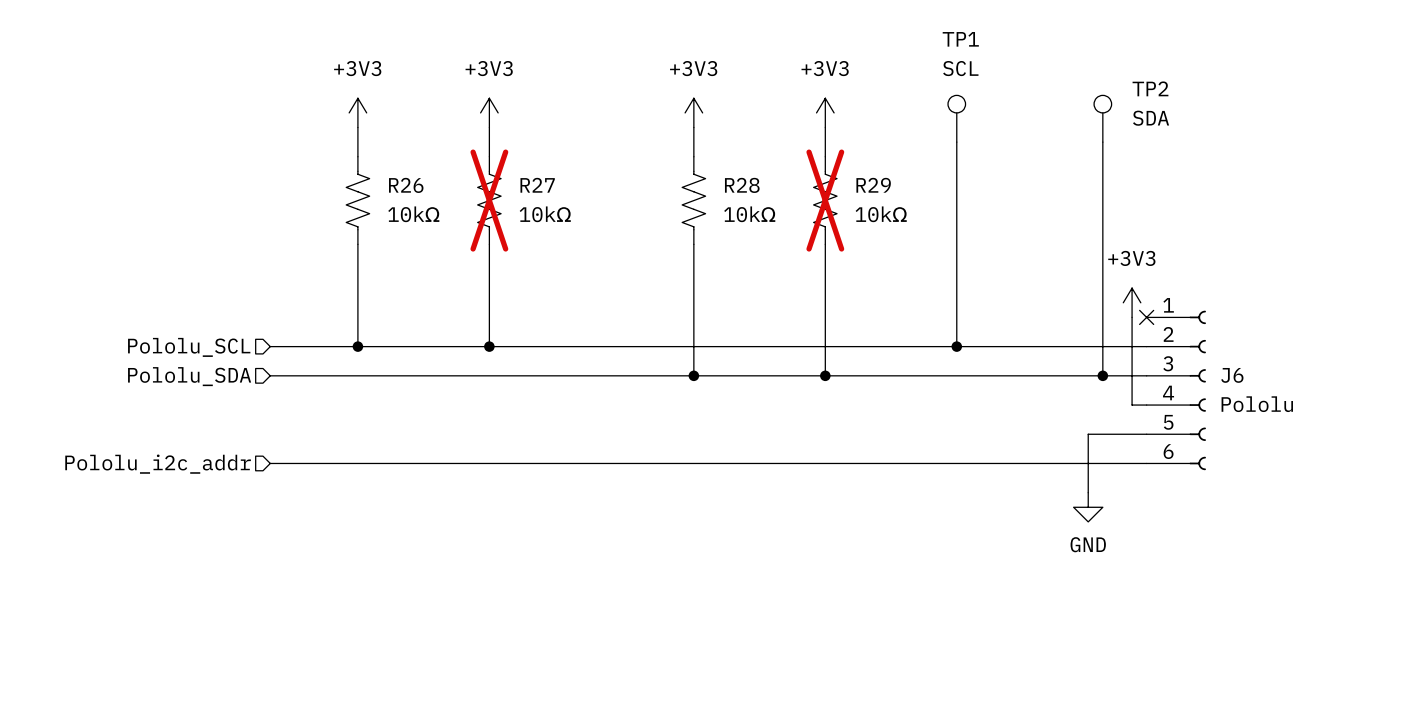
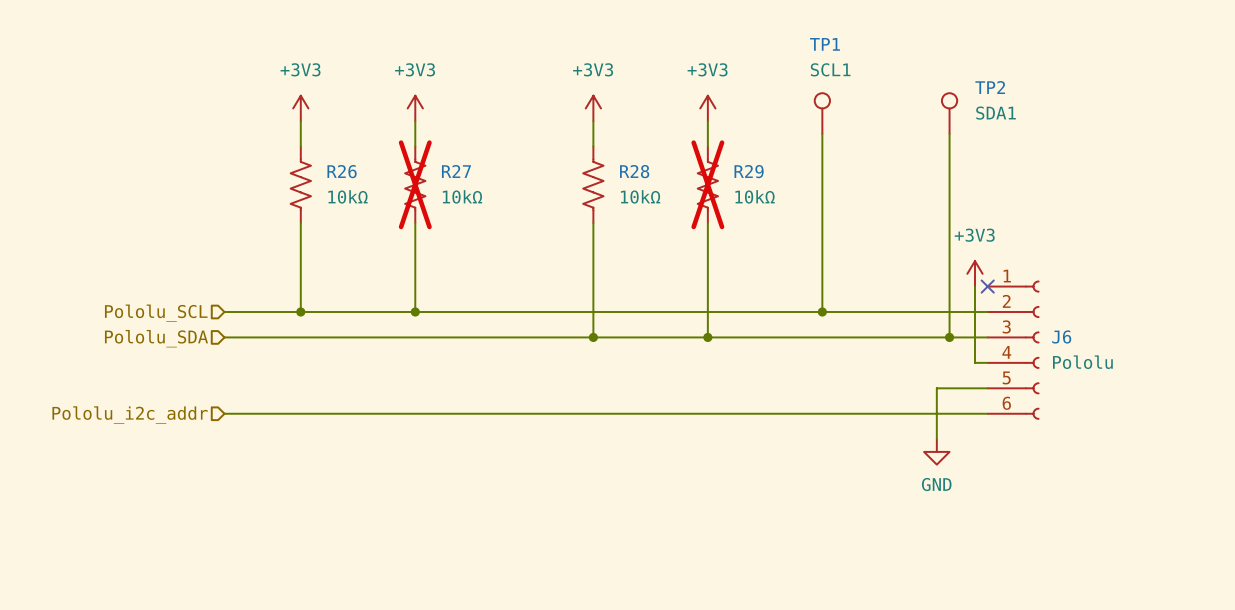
TP1 value: SCL (960, 68) -> SCL1 (830, 69)
TP2 value: SDA (1151, 118) -> SDA1 (996, 113)

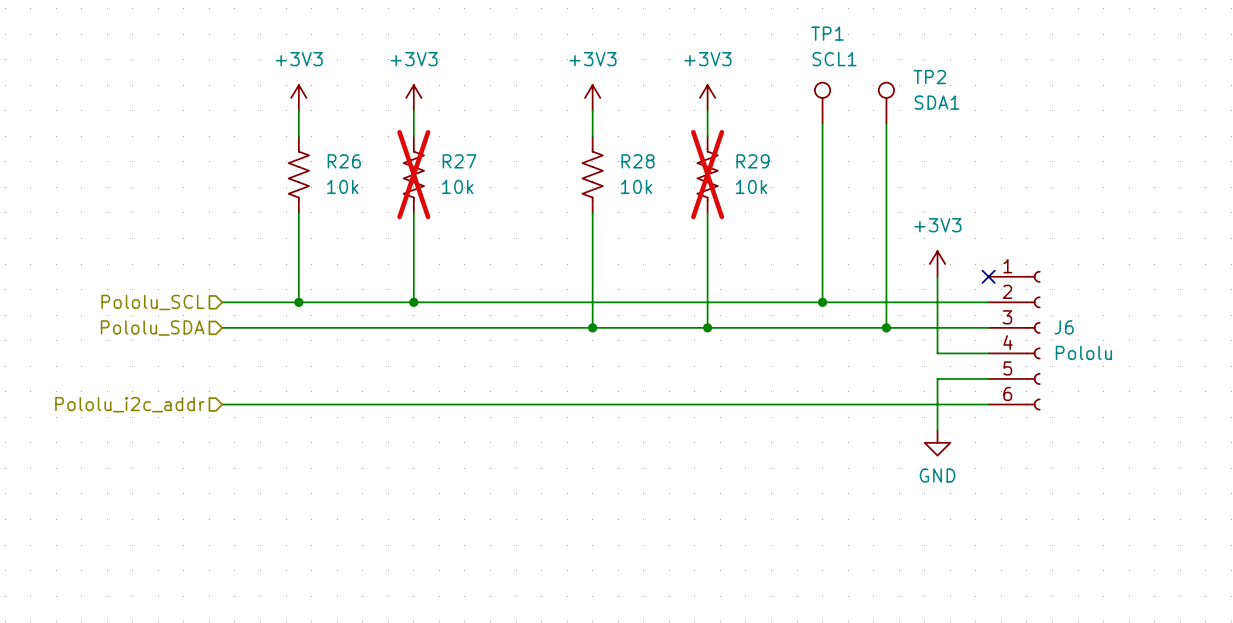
TP2 position: (949, 113) -> (886, 103)
wire: (949, 133) (949, 337) -> (886, 123) (886, 327)
R26 value: 10kΩ (347, 196) -> 10k (342, 186)
R27 value: 10kΩ (462, 196) -> 10k (457, 186)
R28 value: 10kΩ (640, 196) -> 10k (636, 186)
R29 value: 10kΩ (755, 196) -> 10k (751, 186)
power symbol position: +3V3 (975, 273) -> +3V3 (937, 264)
wire: (975, 286) (975, 362) -> (937, 276) (937, 353) (975, 353)
junction: none -> (886, 327)
junction: (949, 337) -> none

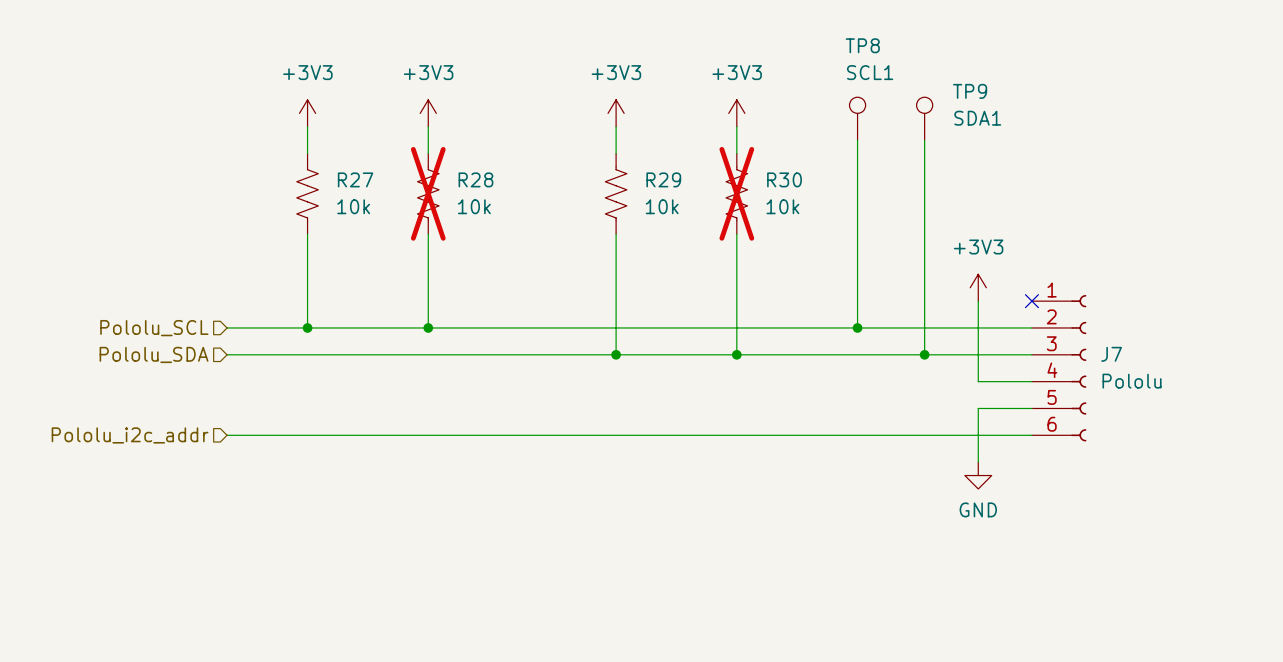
TP1 name: TP1 (827, 33) -> TP8 (862, 45)
TP2 name: TP2 (929, 77) -> TP9 (970, 91)
R26 name: R26 (344, 161) -> R27 (355, 179)
R27 name: R27 (459, 161) -> R28 (475, 179)
R28 name: R28 (638, 161) -> R29 (663, 179)
R29 name: R29 (753, 161) -> R30 (784, 179)
J6 name: J6 (1064, 327) -> J7 (1111, 354)

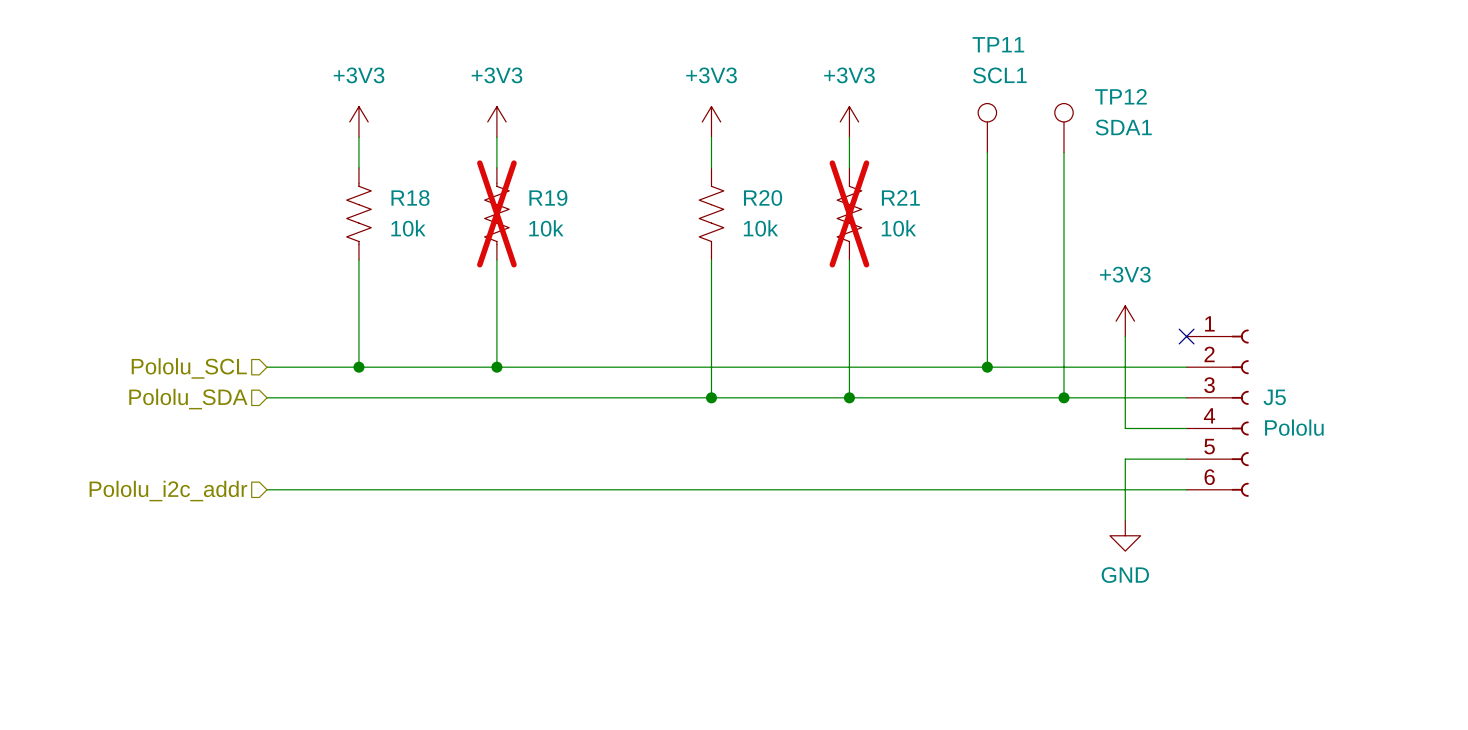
TP8 name: TP8 (862, 45) -> TP11 (998, 44)
TP9 name: TP9 (970, 91) -> TP12 (1120, 96)
R27 name: R27 (355, 179) -> R18 (410, 198)
R28 name: R28 (475, 179) -> R19 (548, 198)
R29 name: R29 (663, 179) -> R20 (763, 198)
R30 name: R30 (784, 179) -> R21 (900, 197)
J7 name: J7 (1111, 354) -> J5 (1274, 397)

